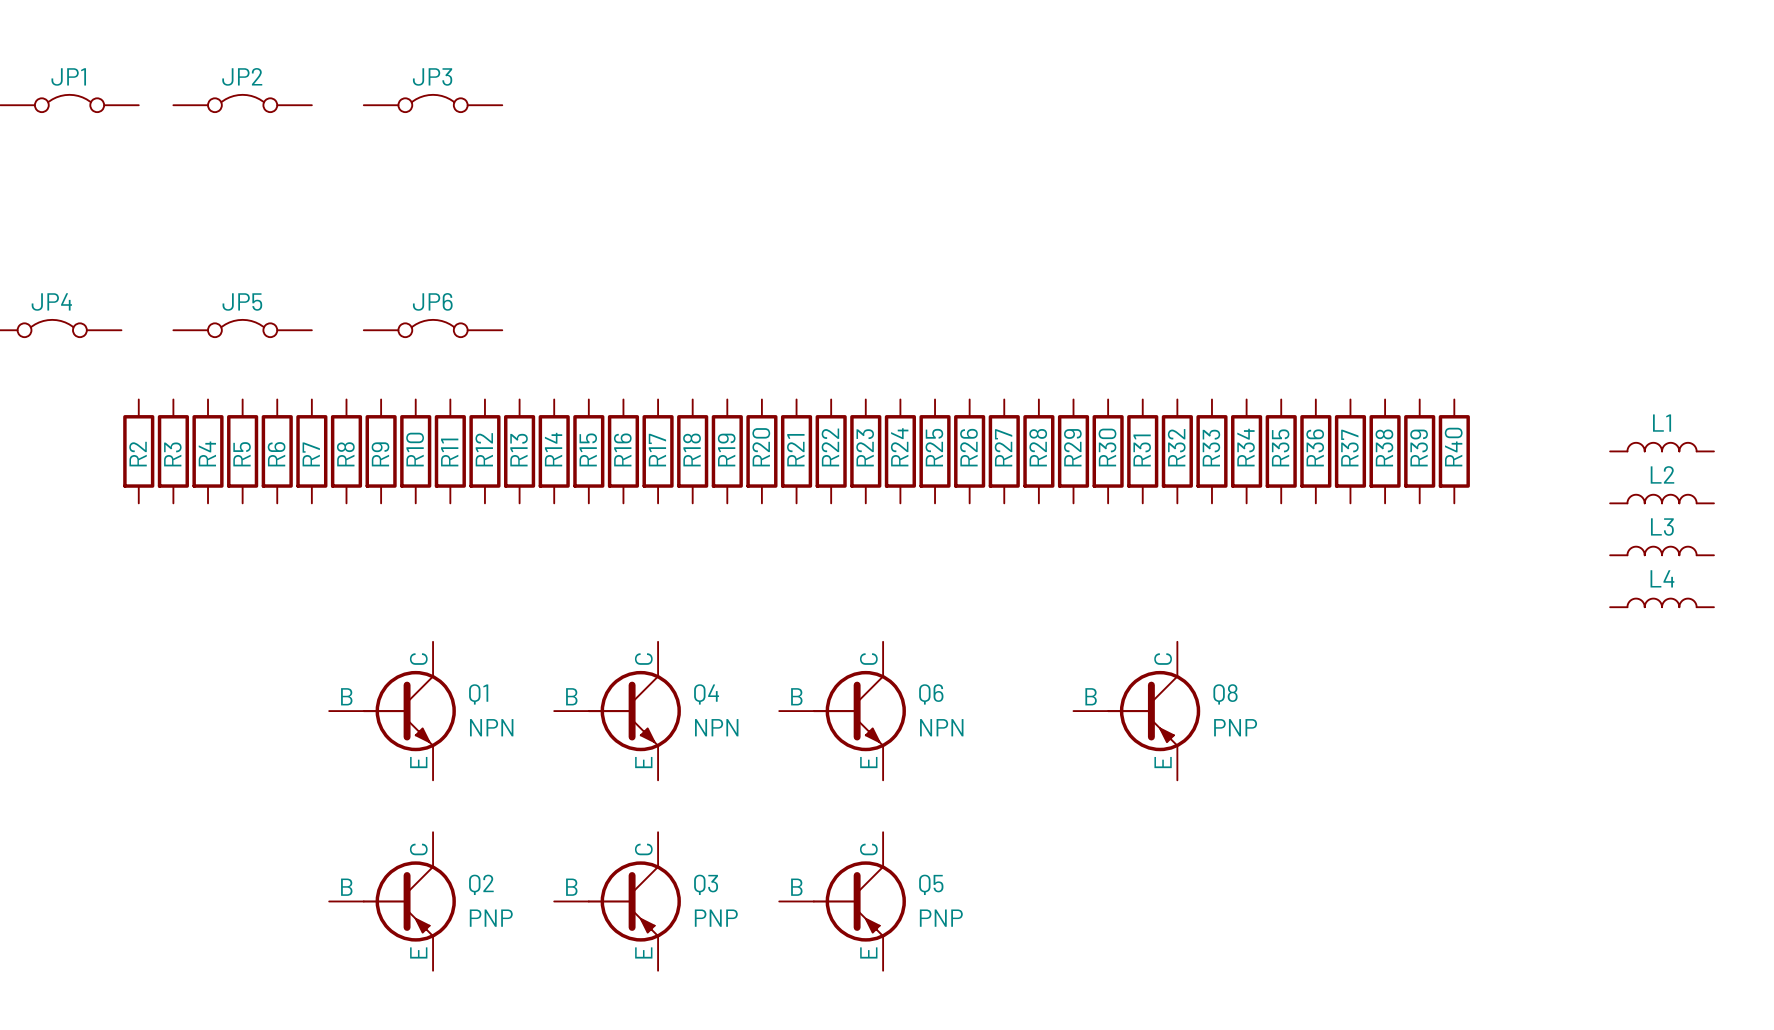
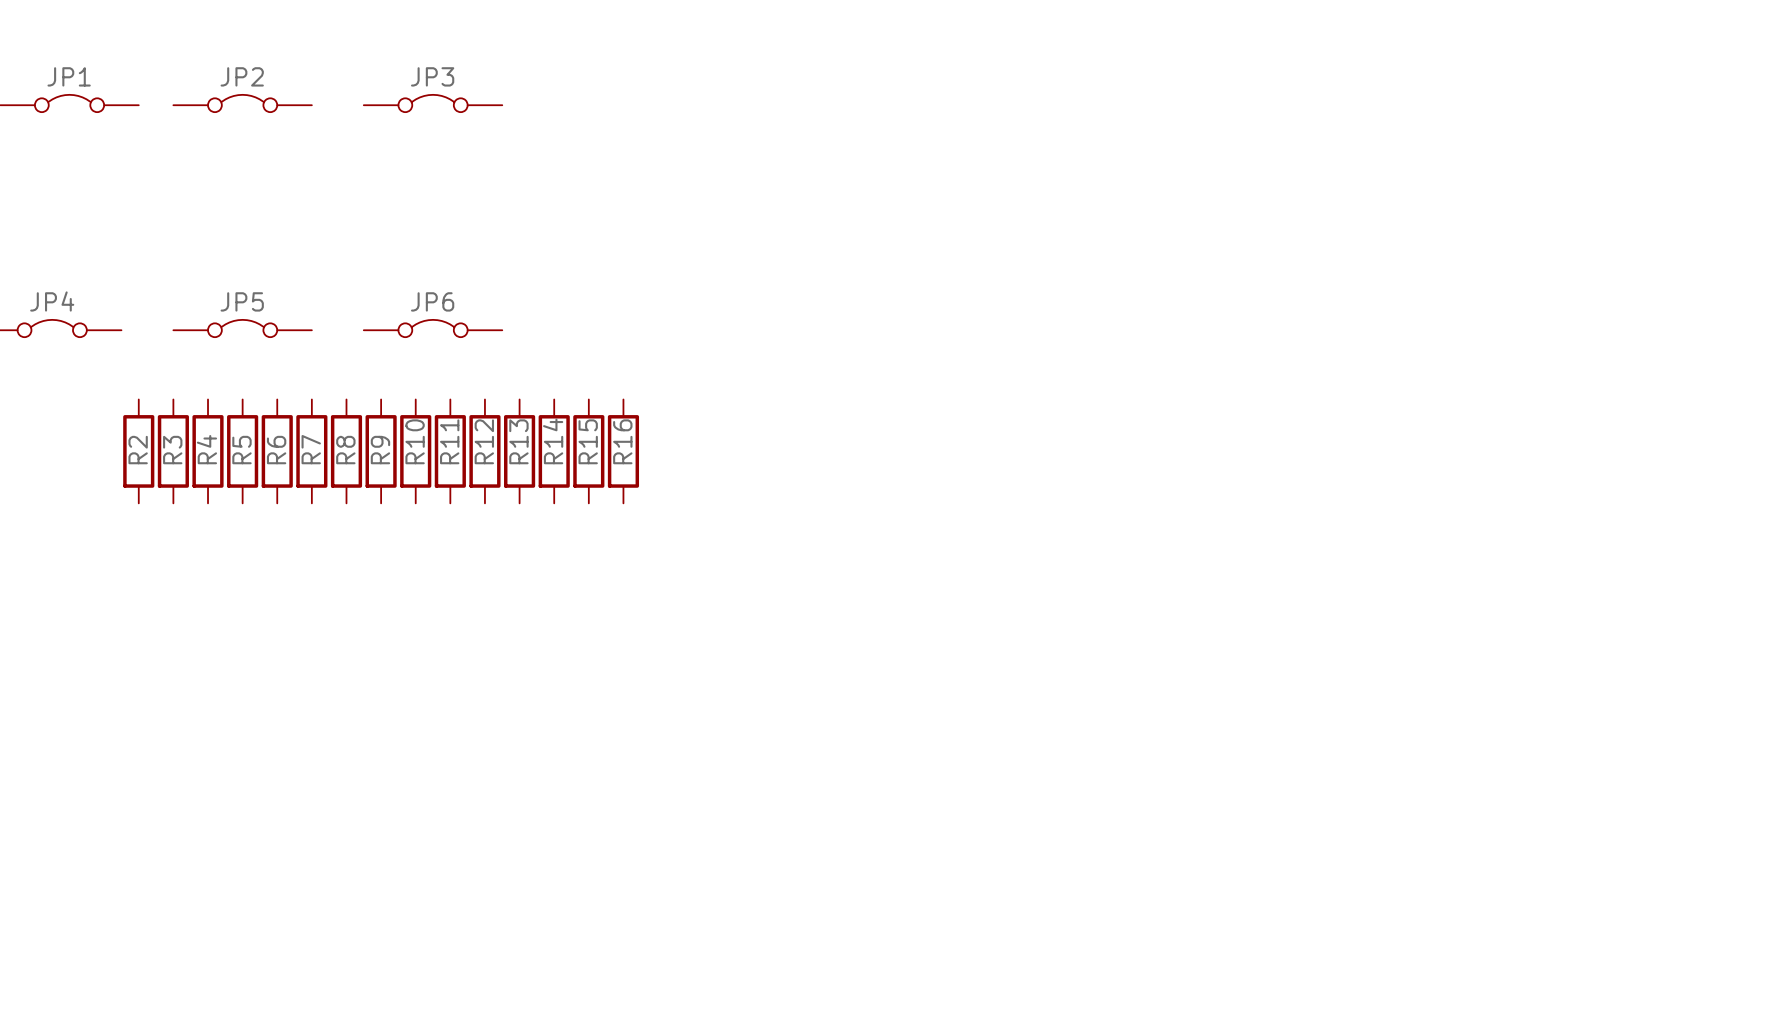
L1: (1662, 447) -> none
R17: (658, 451) -> none
R18: (692, 451) -> none
R19: (727, 451) -> none
R20: (761, 451) -> none
R21: (796, 451) -> none
R22: (831, 451) -> none
R23: (865, 451) -> none
R24: (900, 451) -> none
R25: (935, 451) -> none
R26: (969, 451) -> none
R27: (1004, 451) -> none
R28: (1038, 451) -> none
R29: (1073, 451) -> none
R30: (1108, 451) -> none
R31: (1142, 451) -> none
R32: (1177, 451) -> none
R33: (1211, 451) -> none
R34: (1246, 451) -> none
R35: (1281, 451) -> none
R36: (1315, 451) -> none
R37: (1350, 451) -> none
R38: (1385, 451) -> none
R39: (1419, 451) -> none
R40: (1454, 451) -> none
L2: (1662, 499) -> none
L3: (1662, 550) -> none
L4: (1662, 602) -> none
Q1: NPN (392, 711) -> none
Q4: NPN (617, 711) -> none
Q6: NPN (842, 711) -> none
Q8: PNP (1136, 711) -> none
Q2: PNP (392, 901) -> none
Q3: PNP (617, 901) -> none
Q5: PNP (842, 901) -> none

